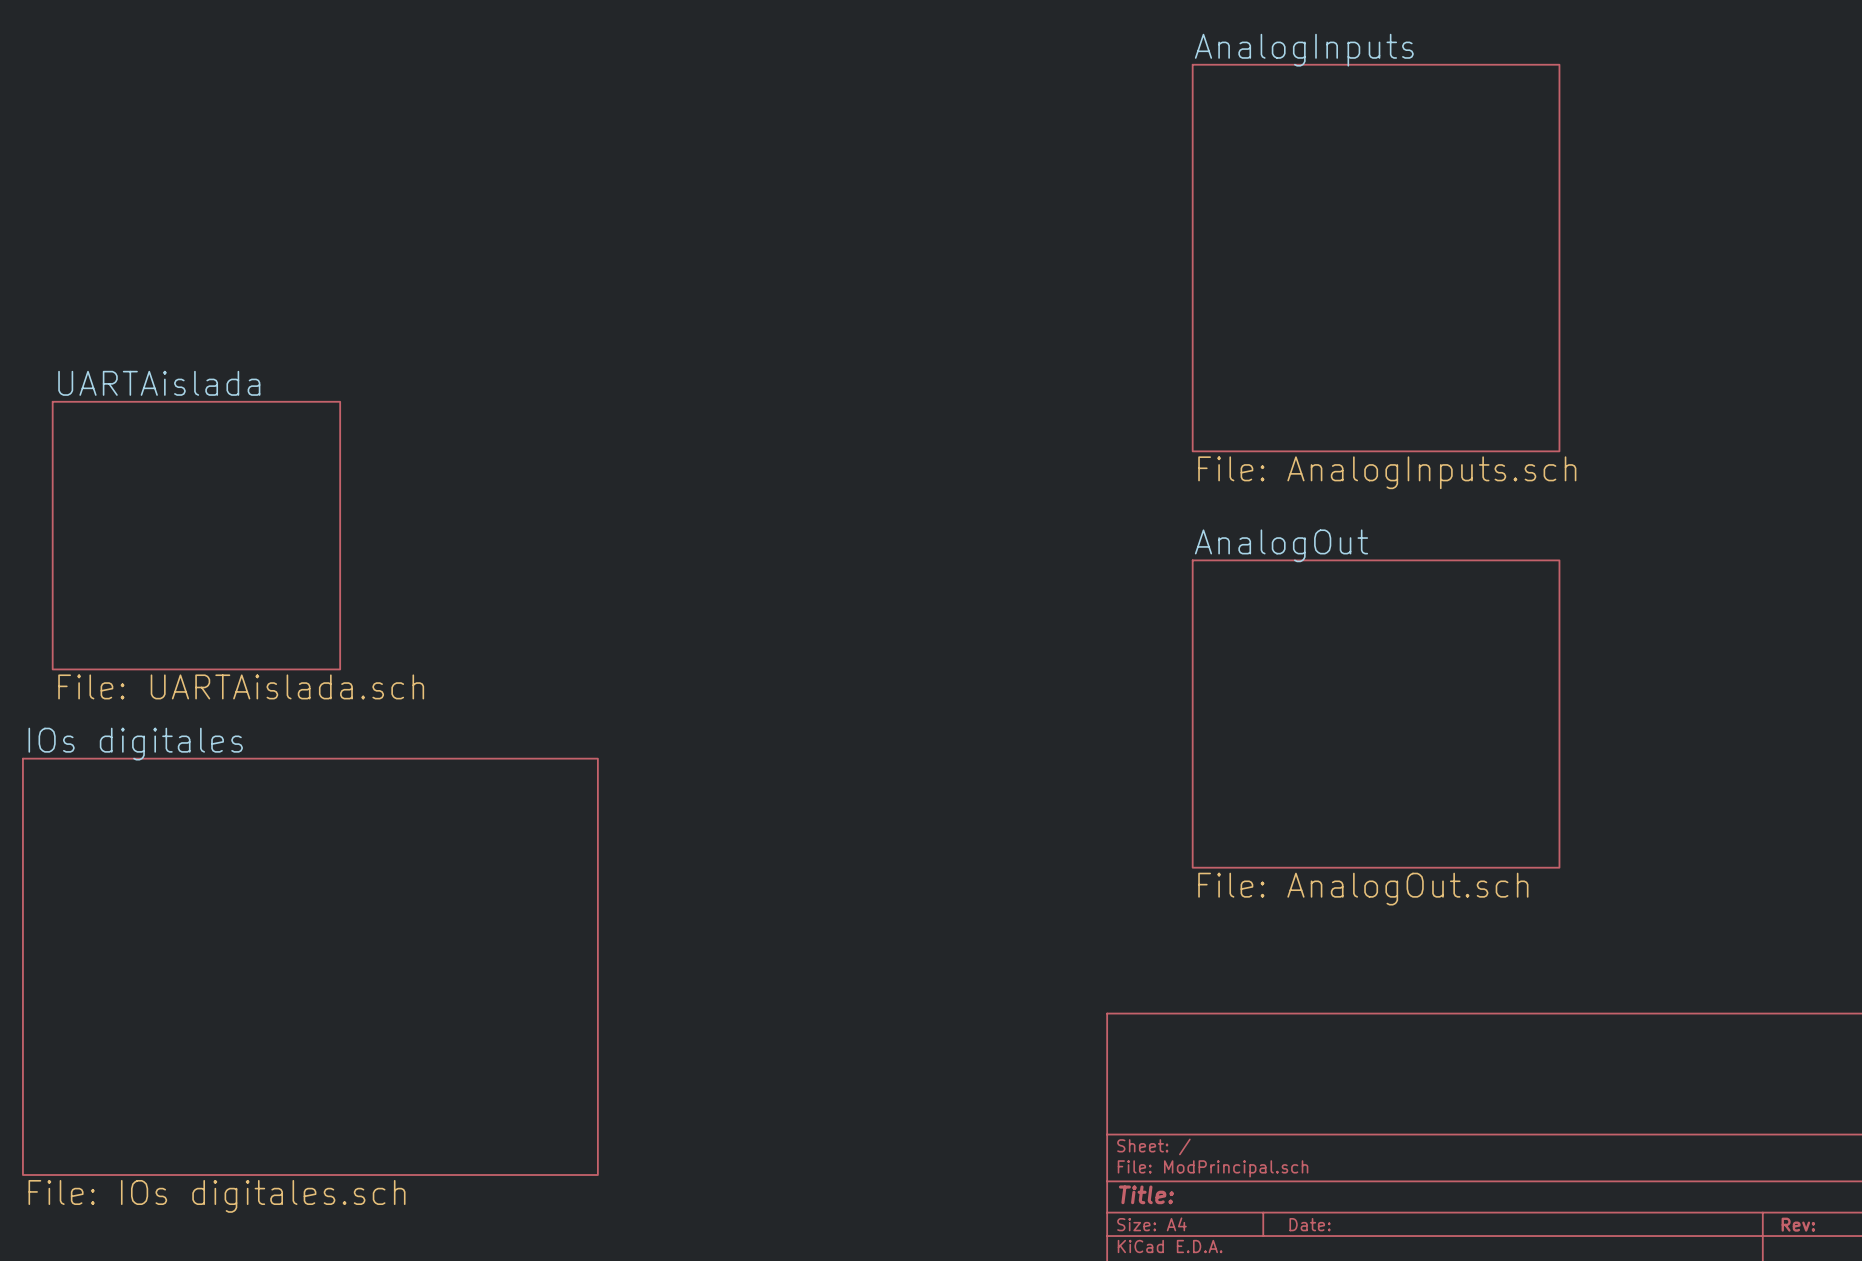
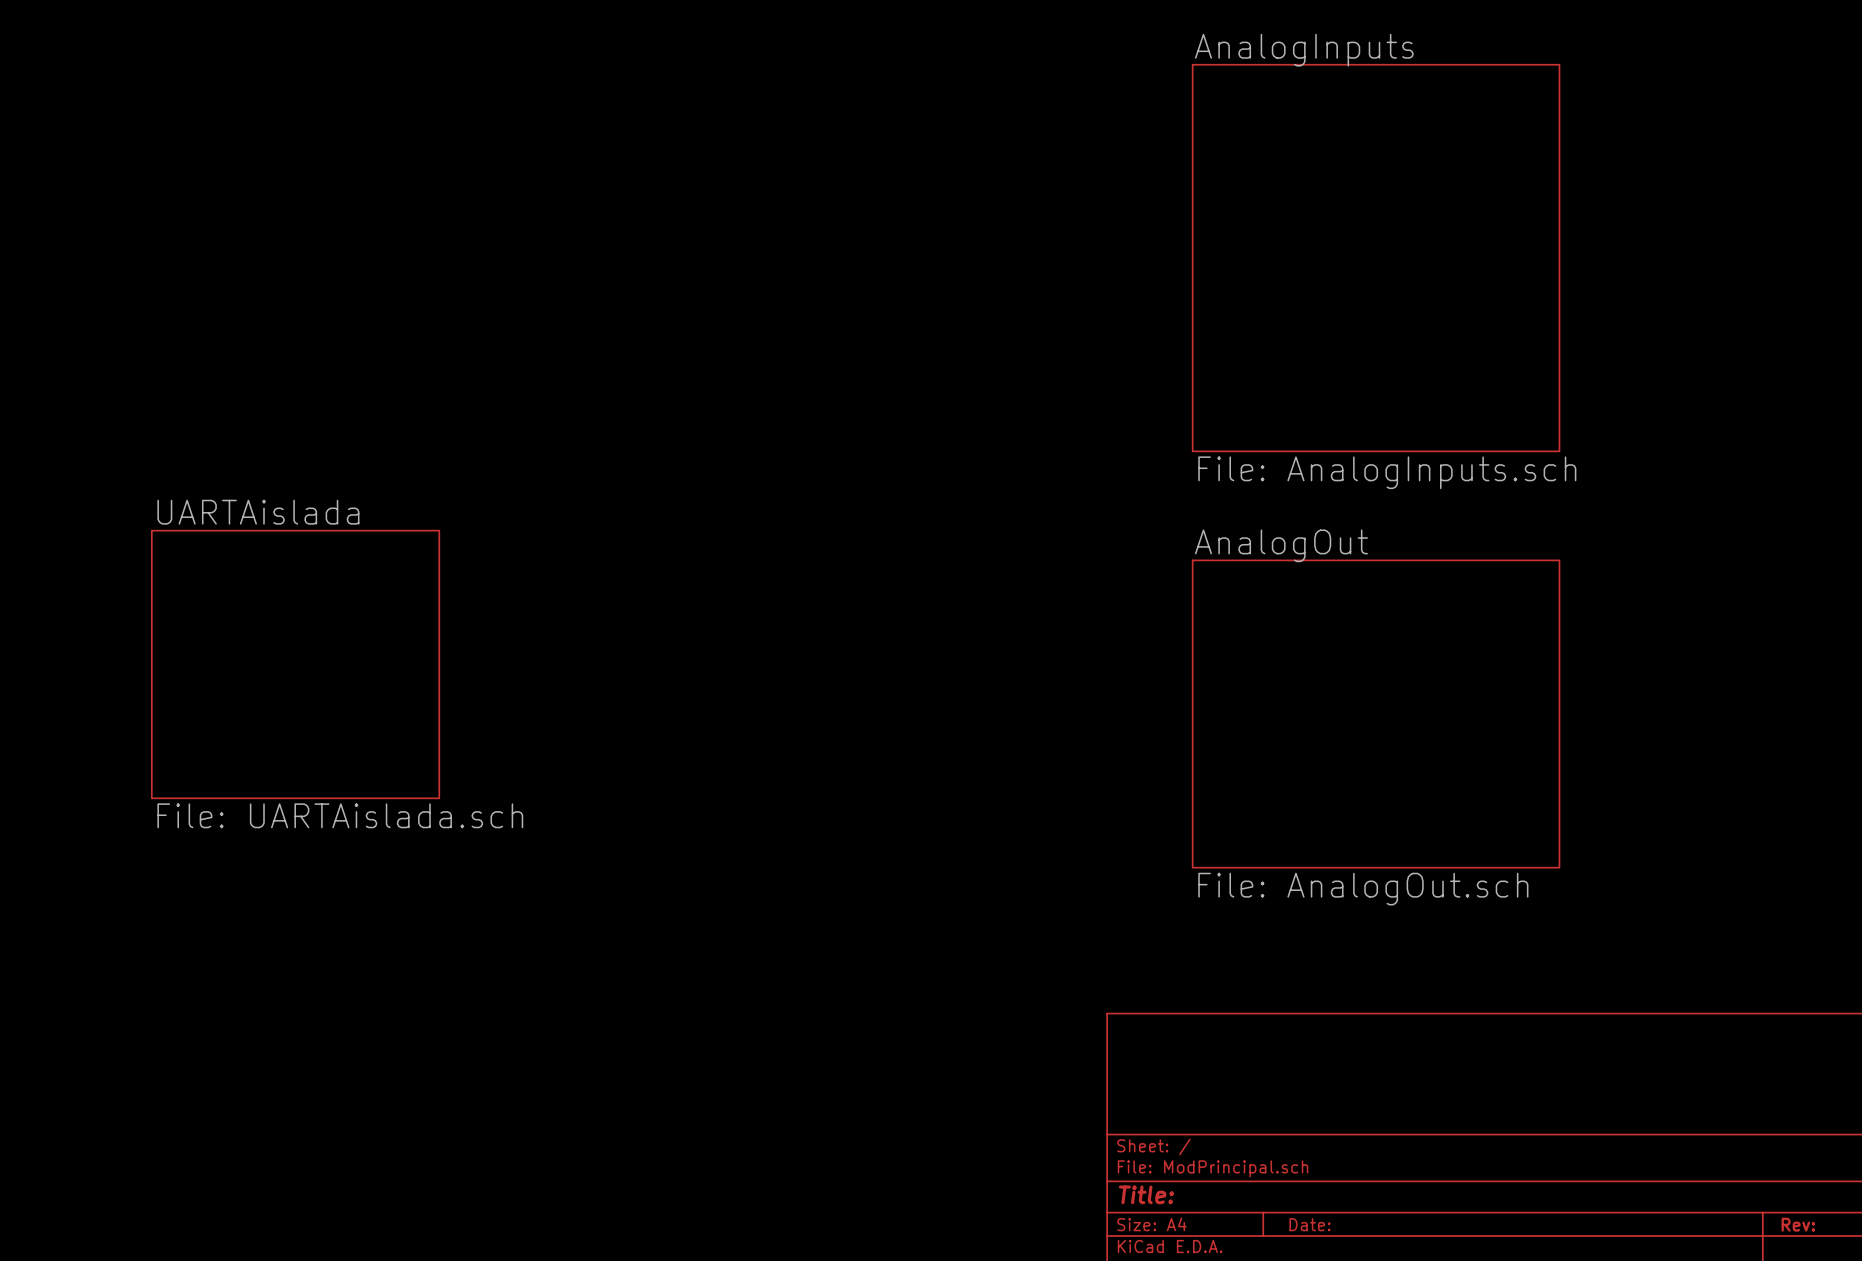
sheet UARTAislada position: (196, 535) -> (295, 664)
sheet IOs digitales: File: IOs digitales.sch (310, 966) -> none

